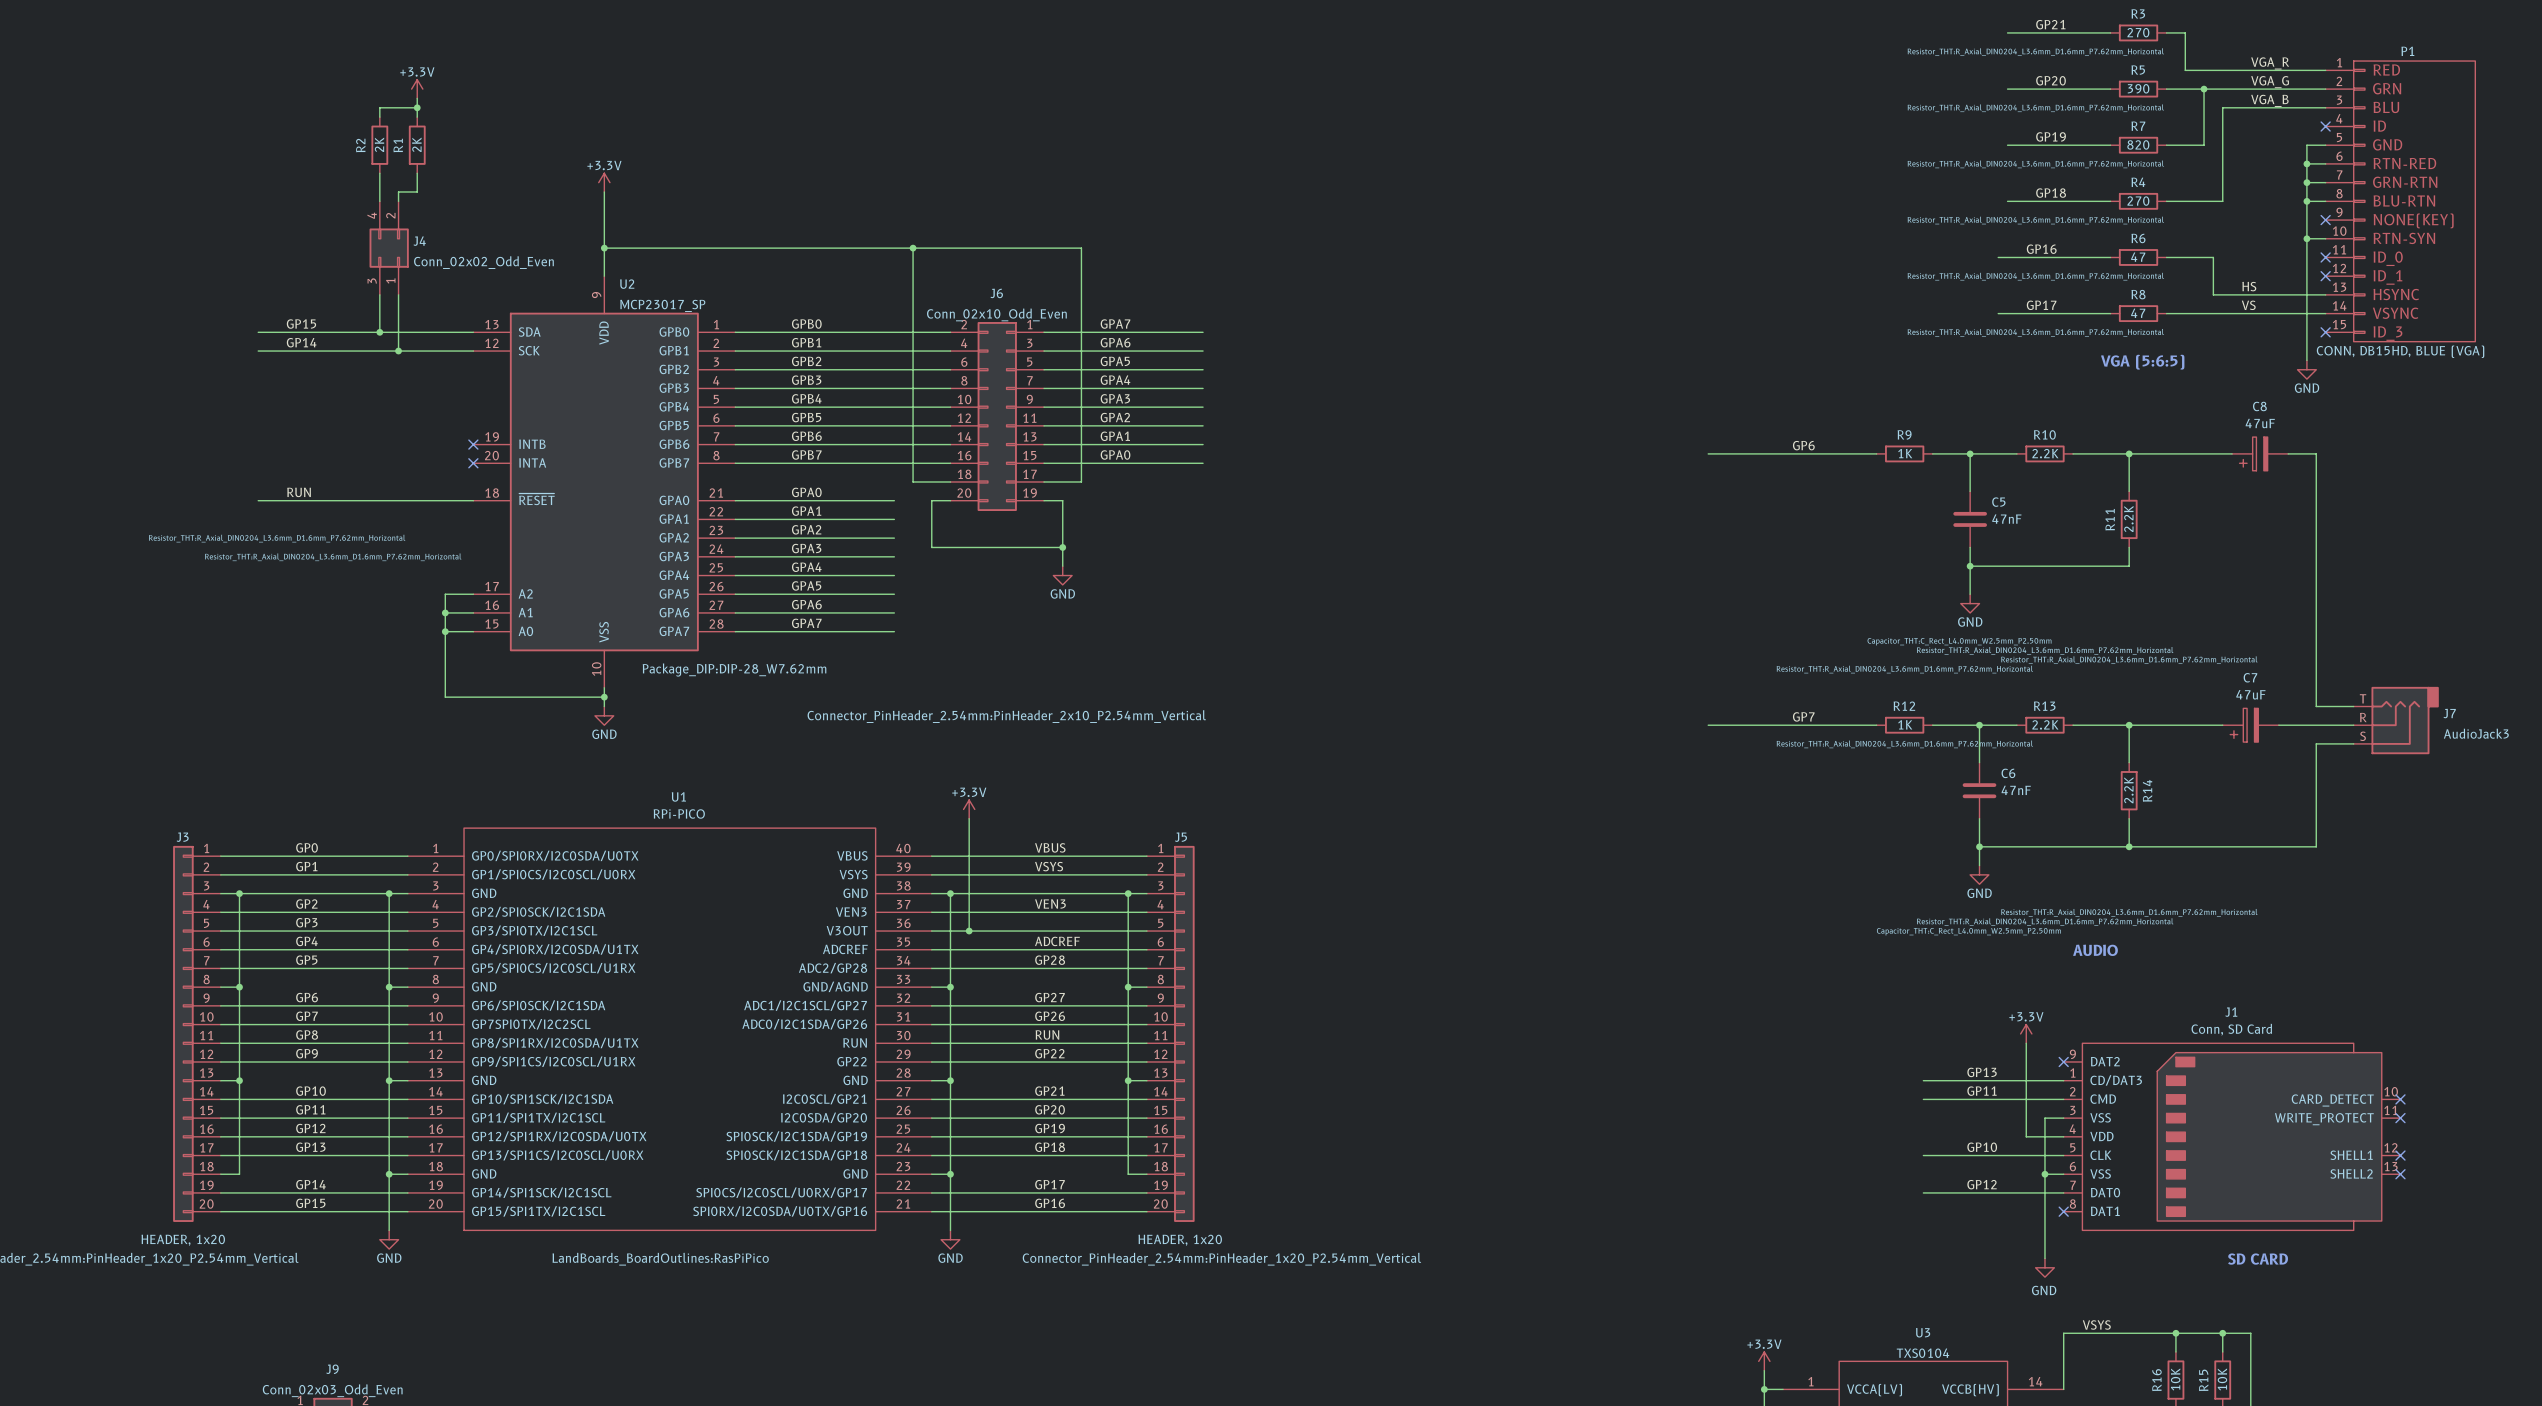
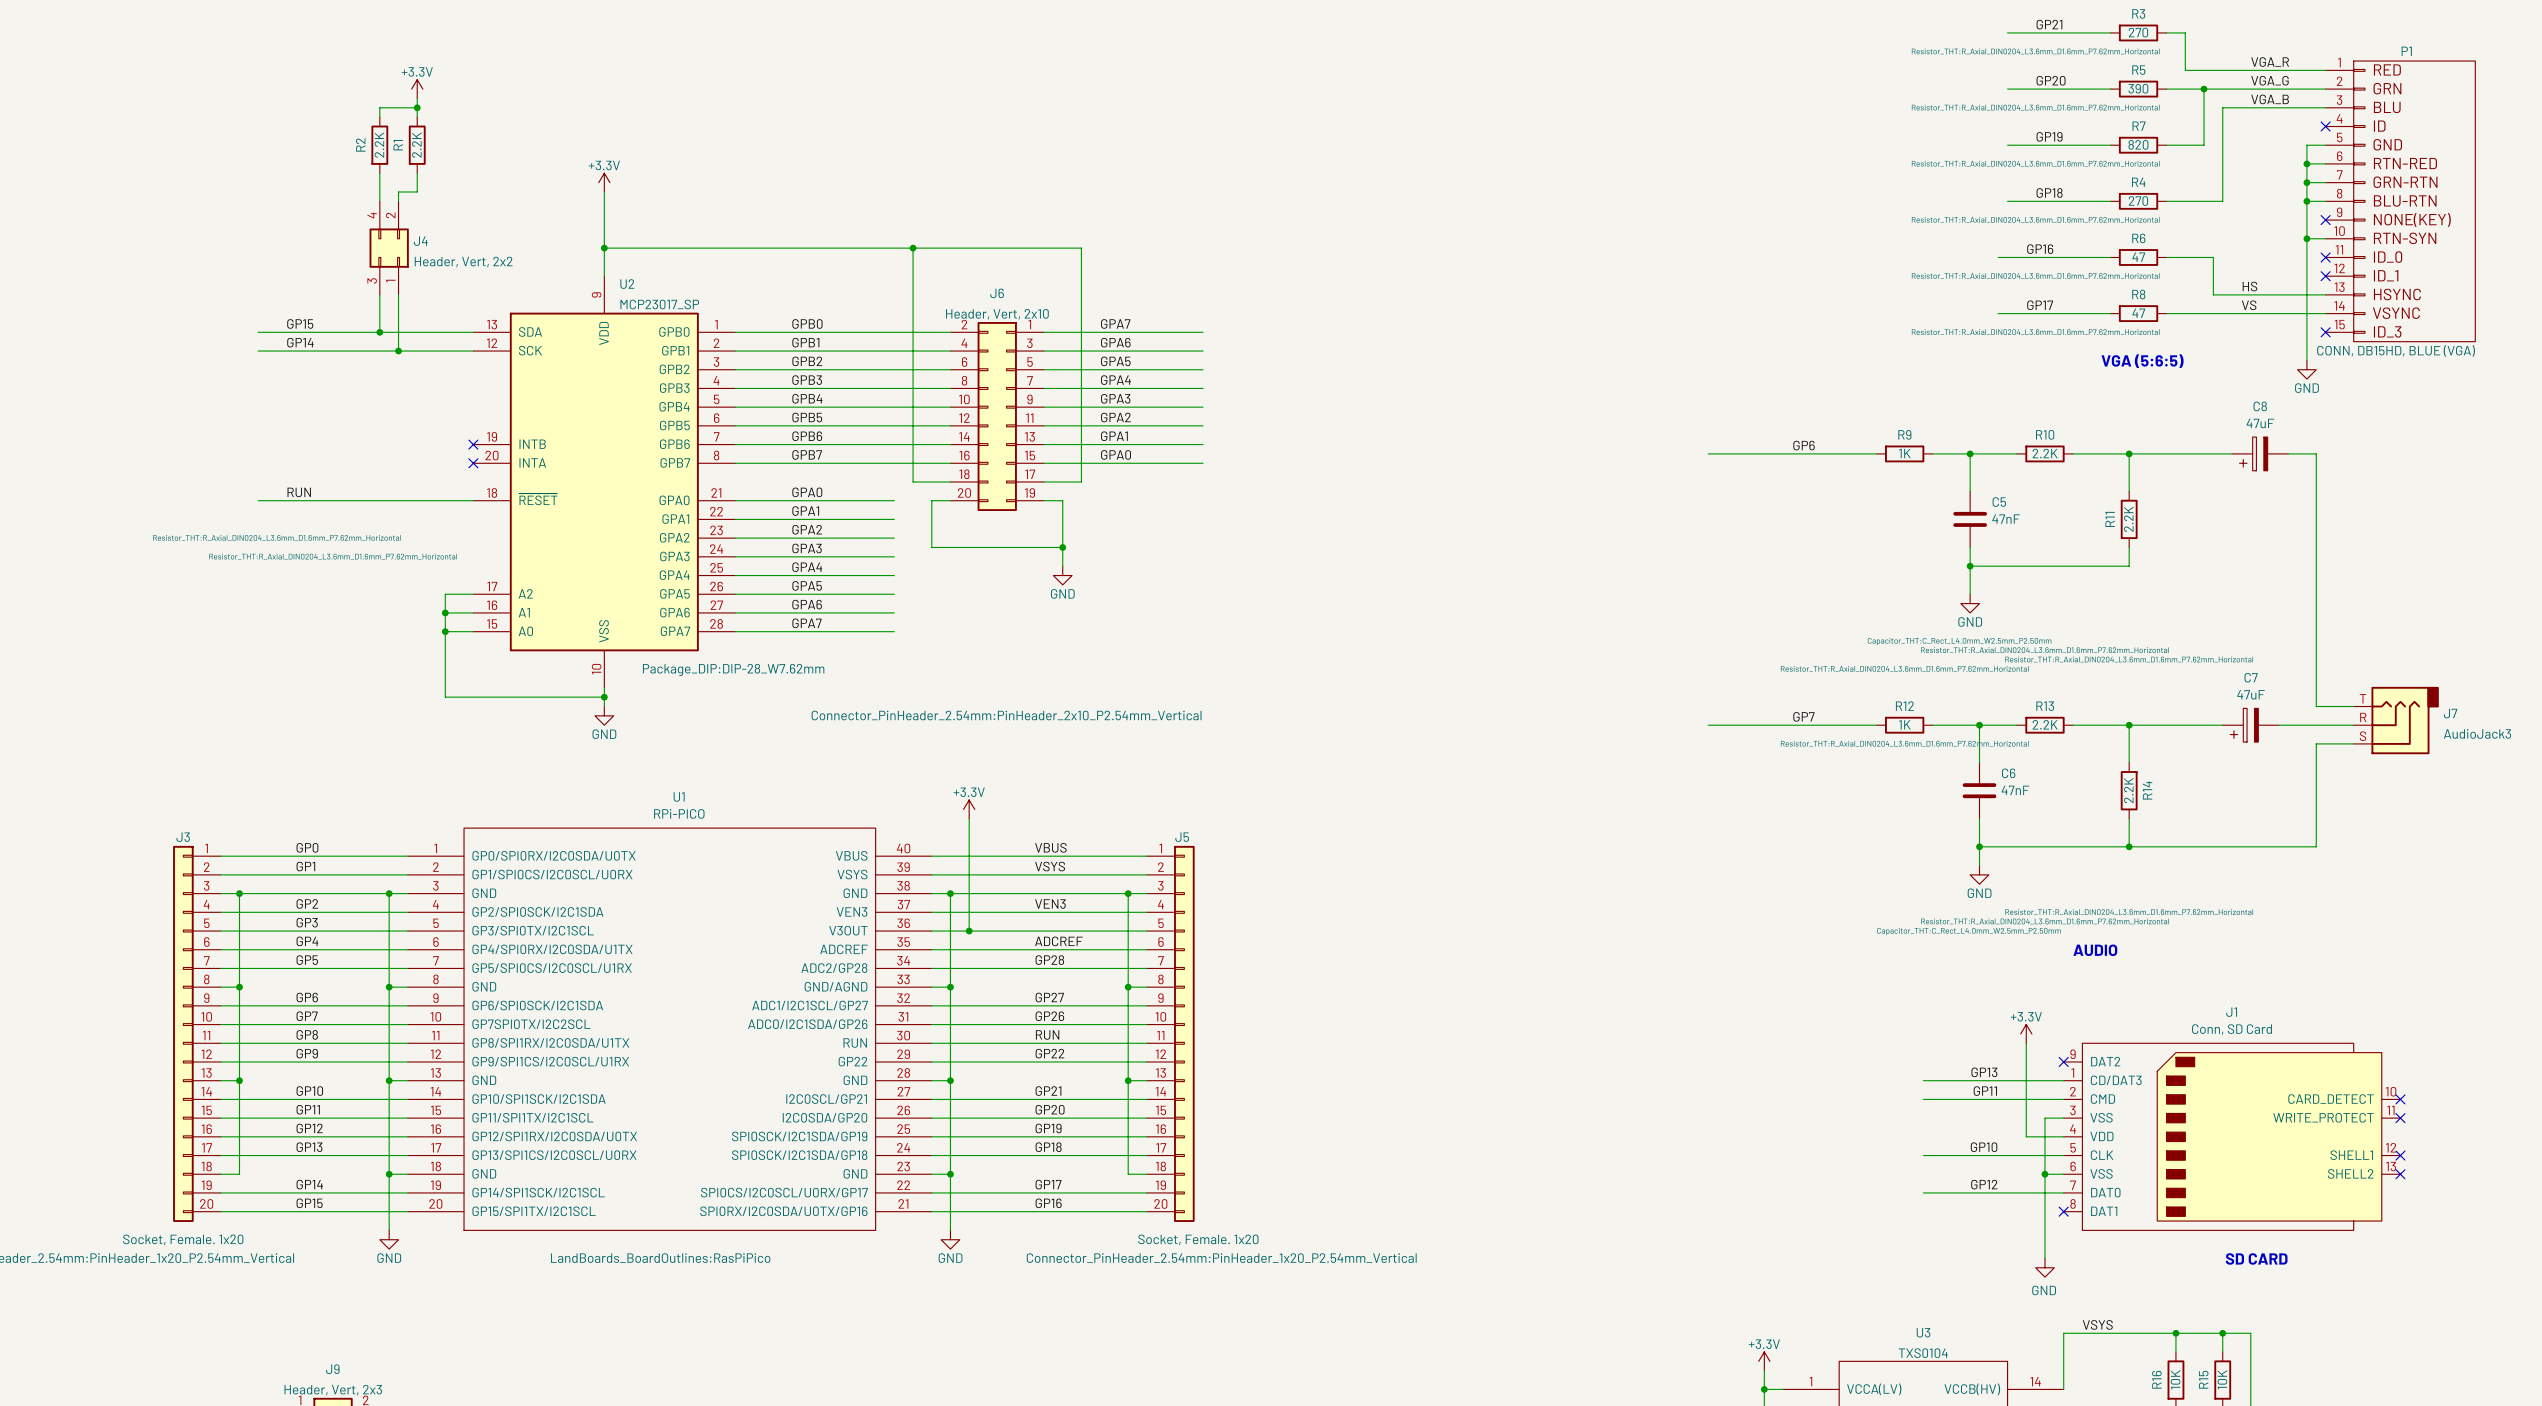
R2 value: 2K (379, 144) -> 2.2K (379, 145)
R1 value: 2K (416, 144) -> 2.2K (416, 145)
J4 value: Conn_02x02_Odd_Even (483, 262) -> Header, Vert, 2x2 (463, 261)
J6 value: Conn_02x10_Odd_Even (996, 314) -> Header, Vert, 2x10 (997, 314)
J3 value: HEADER, 1x20 (183, 1240) -> Socket, Female. 1x20 (183, 1239)
J5 value: HEADER, 1x20 (1180, 1240) -> Socket, Female. 1x20 (1198, 1239)
J9 value: Conn_02x03_Odd_Even (332, 1390) -> Header, Vert, 2x3 (333, 1390)

